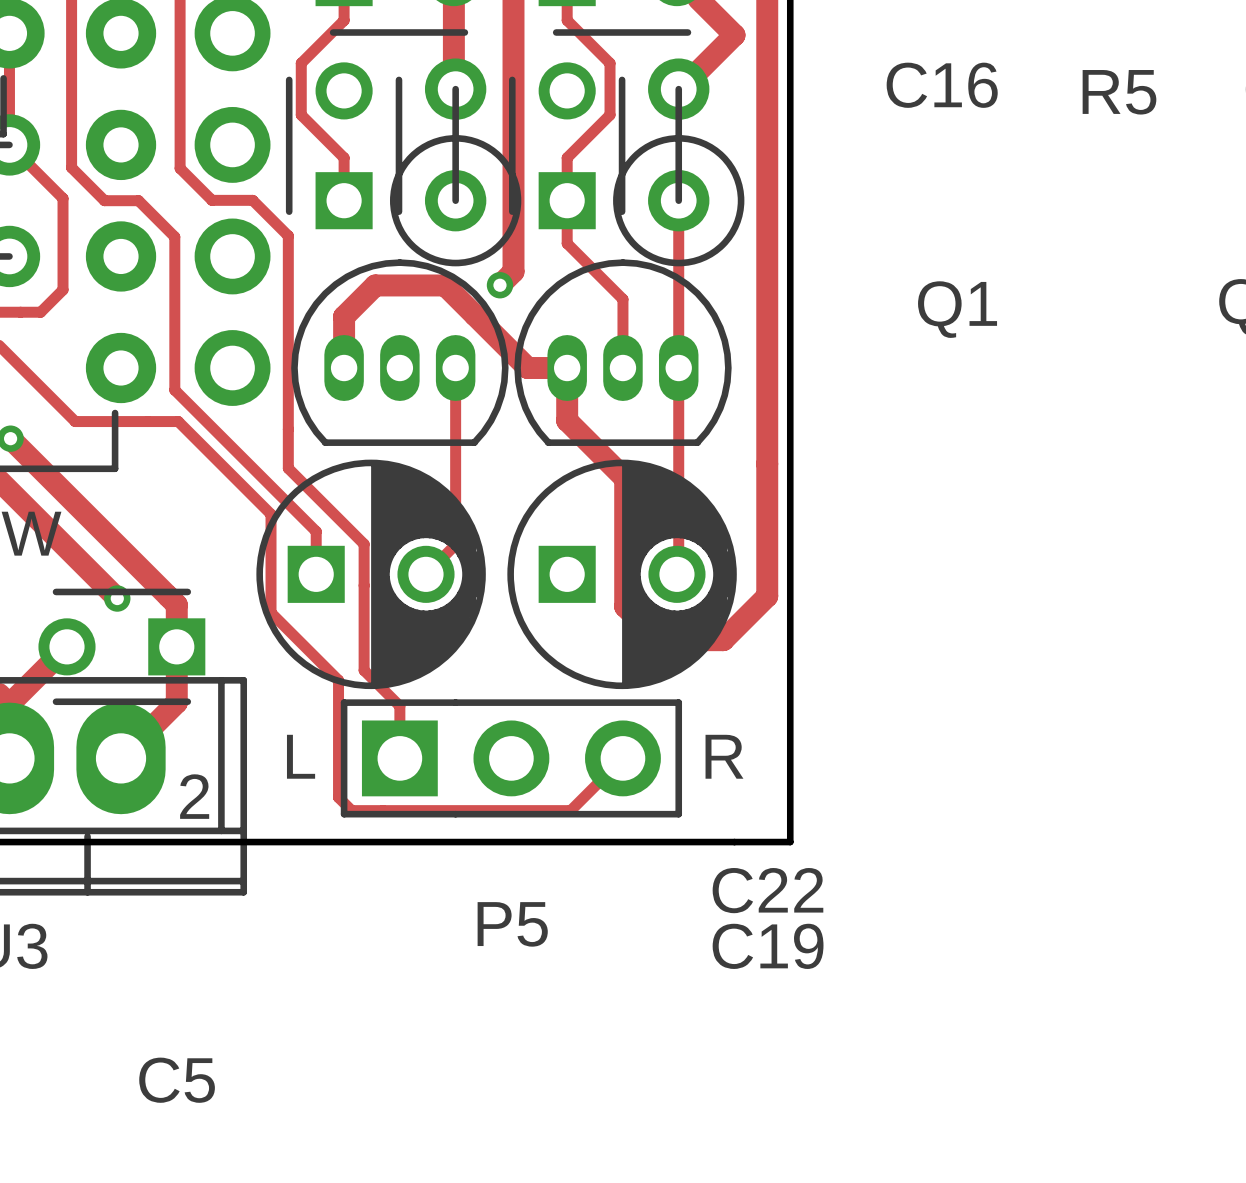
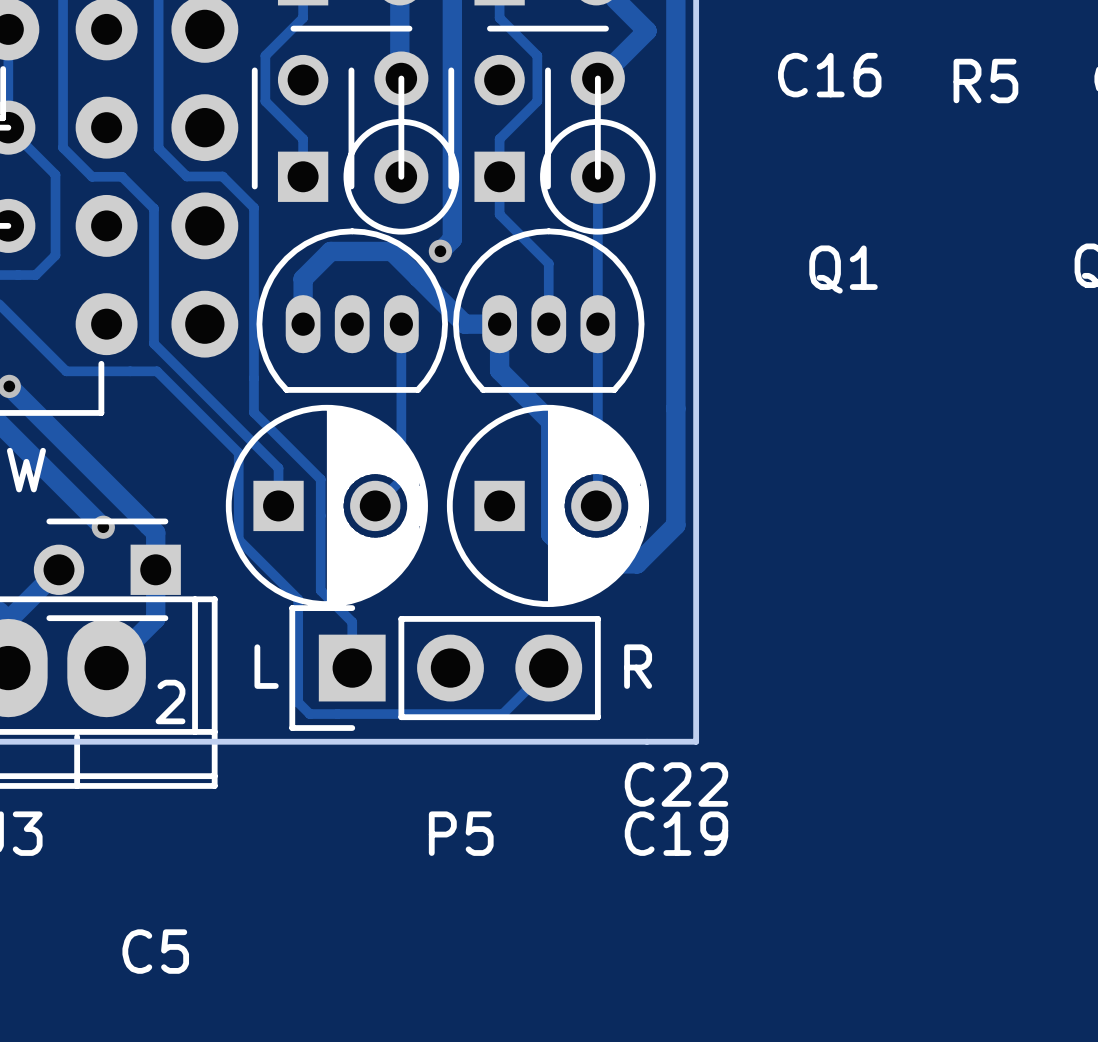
P5 footprint: [340, 699, 683, 818] -> [289, 605, 601, 731]

